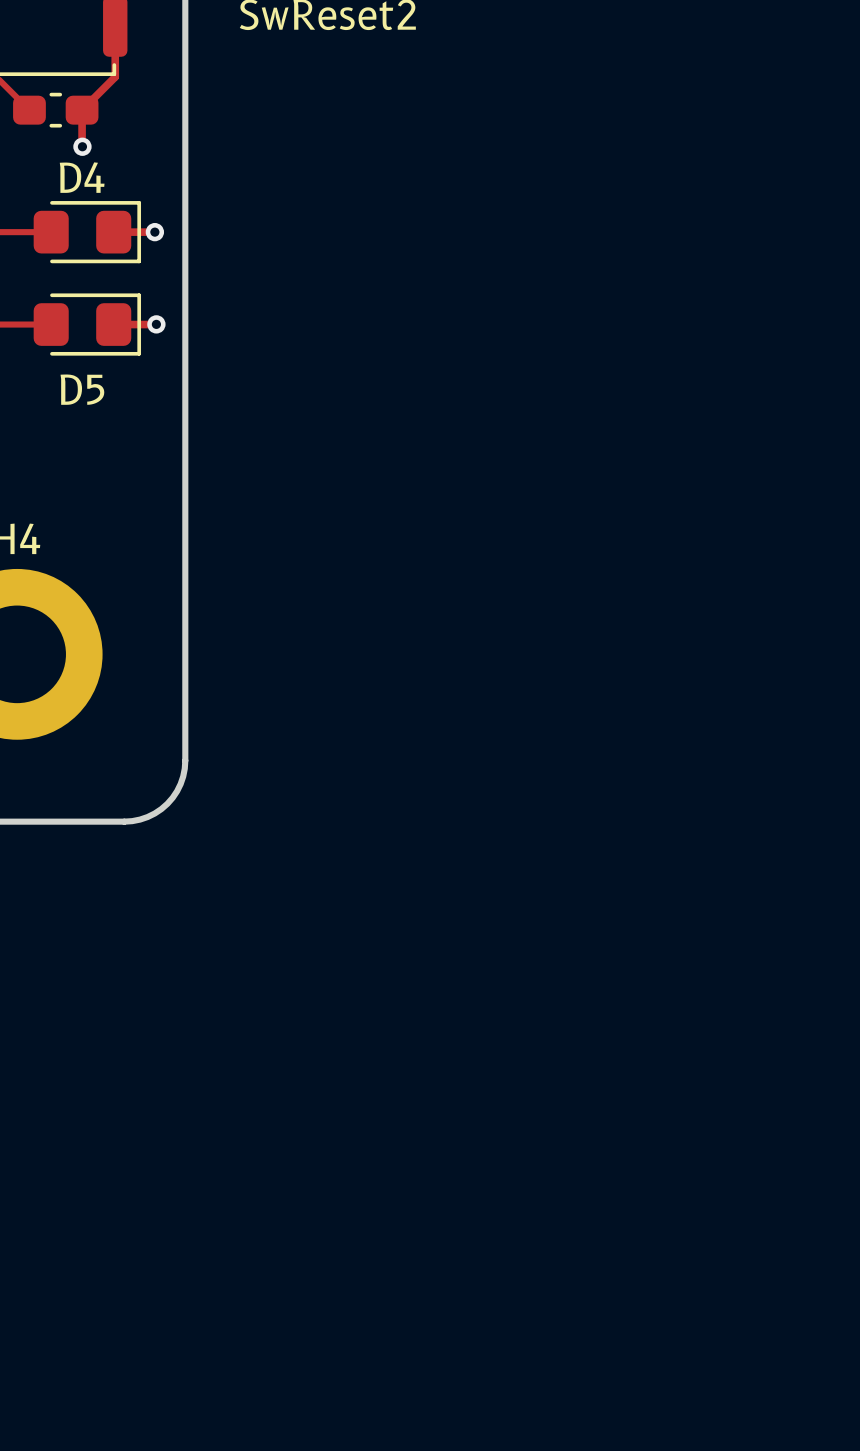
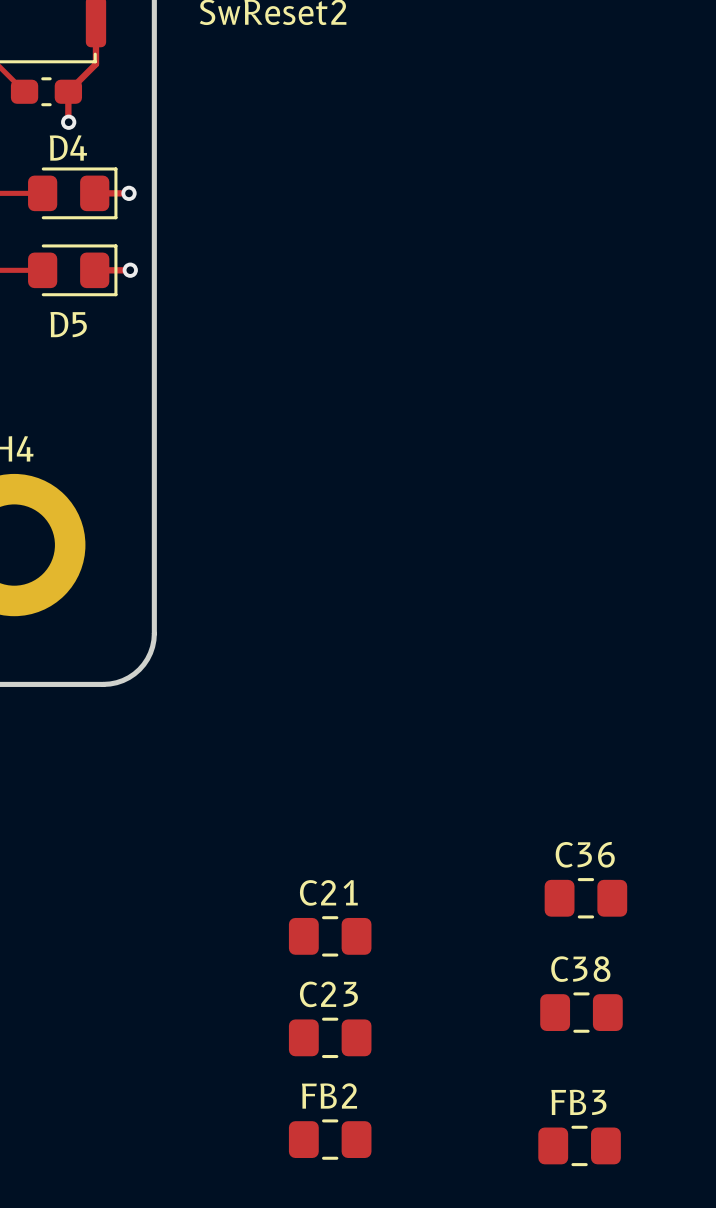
C36: none -> (585, 898)
C21: none -> (330, 936)
C38: none -> (581, 1012)
C23: none -> (330, 1037)
FB2: none -> (330, 1139)
FB3: none -> (579, 1145)

